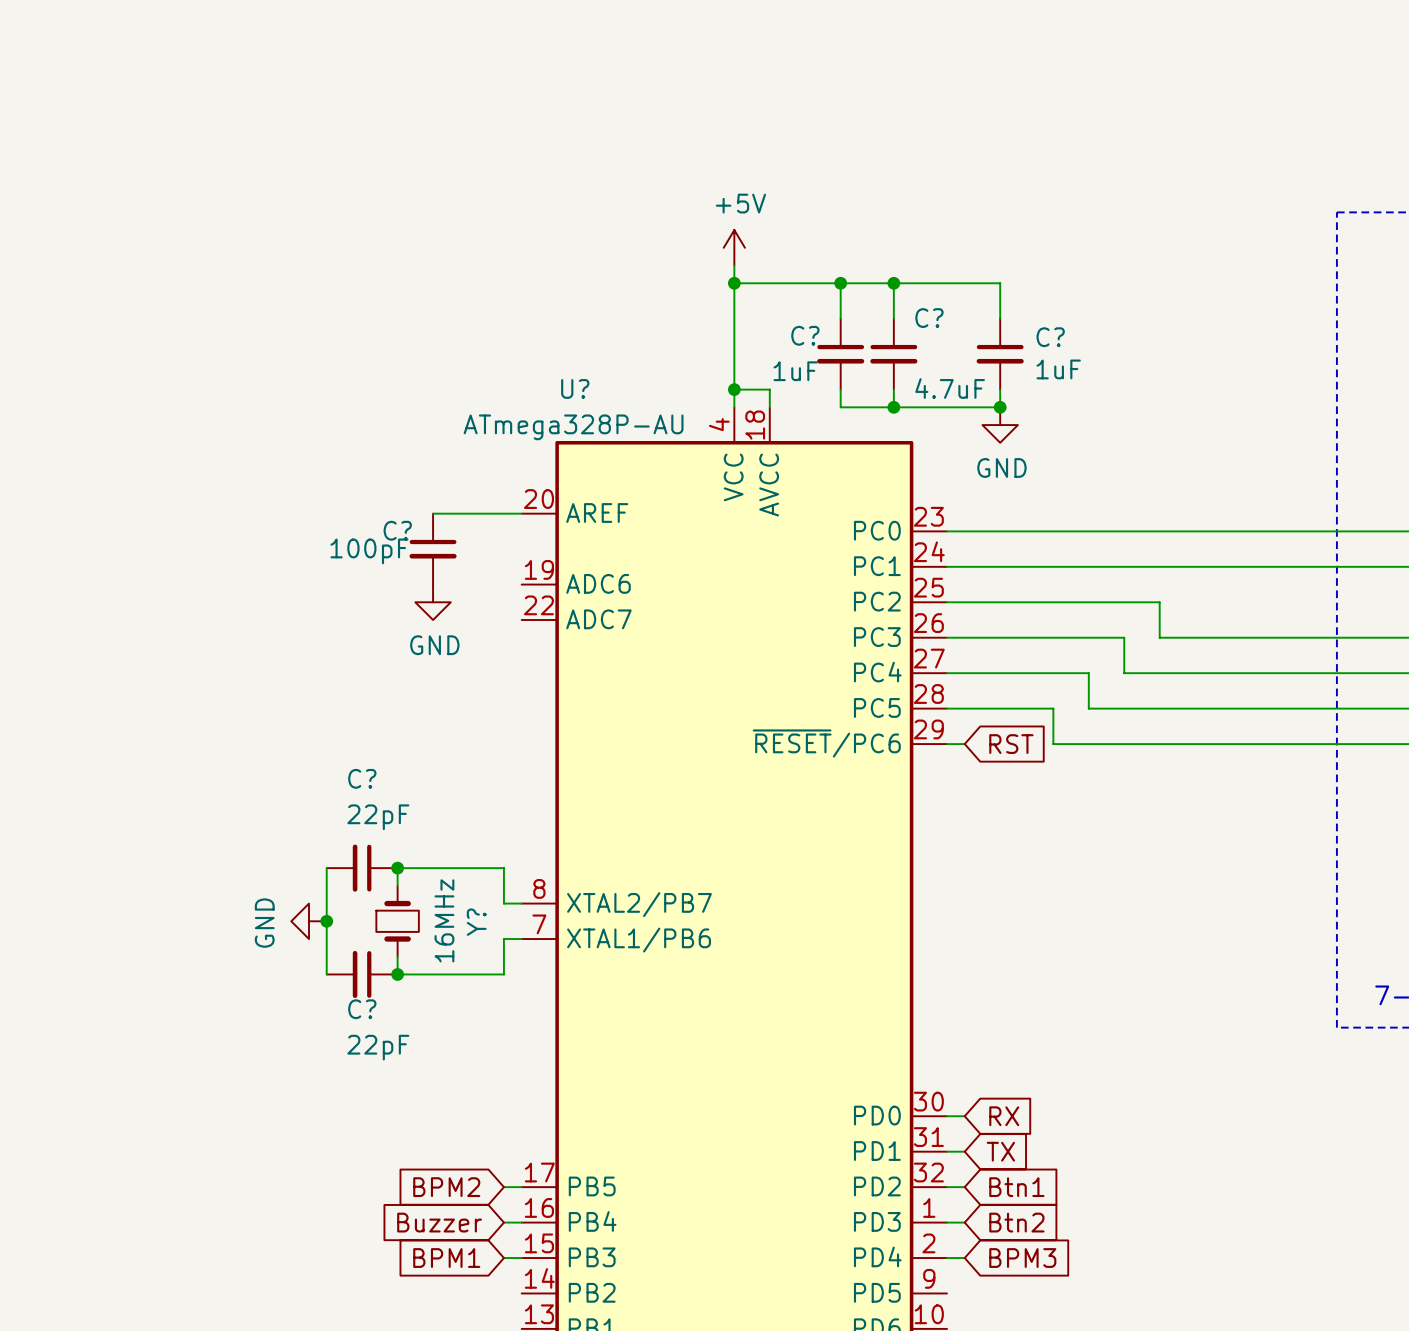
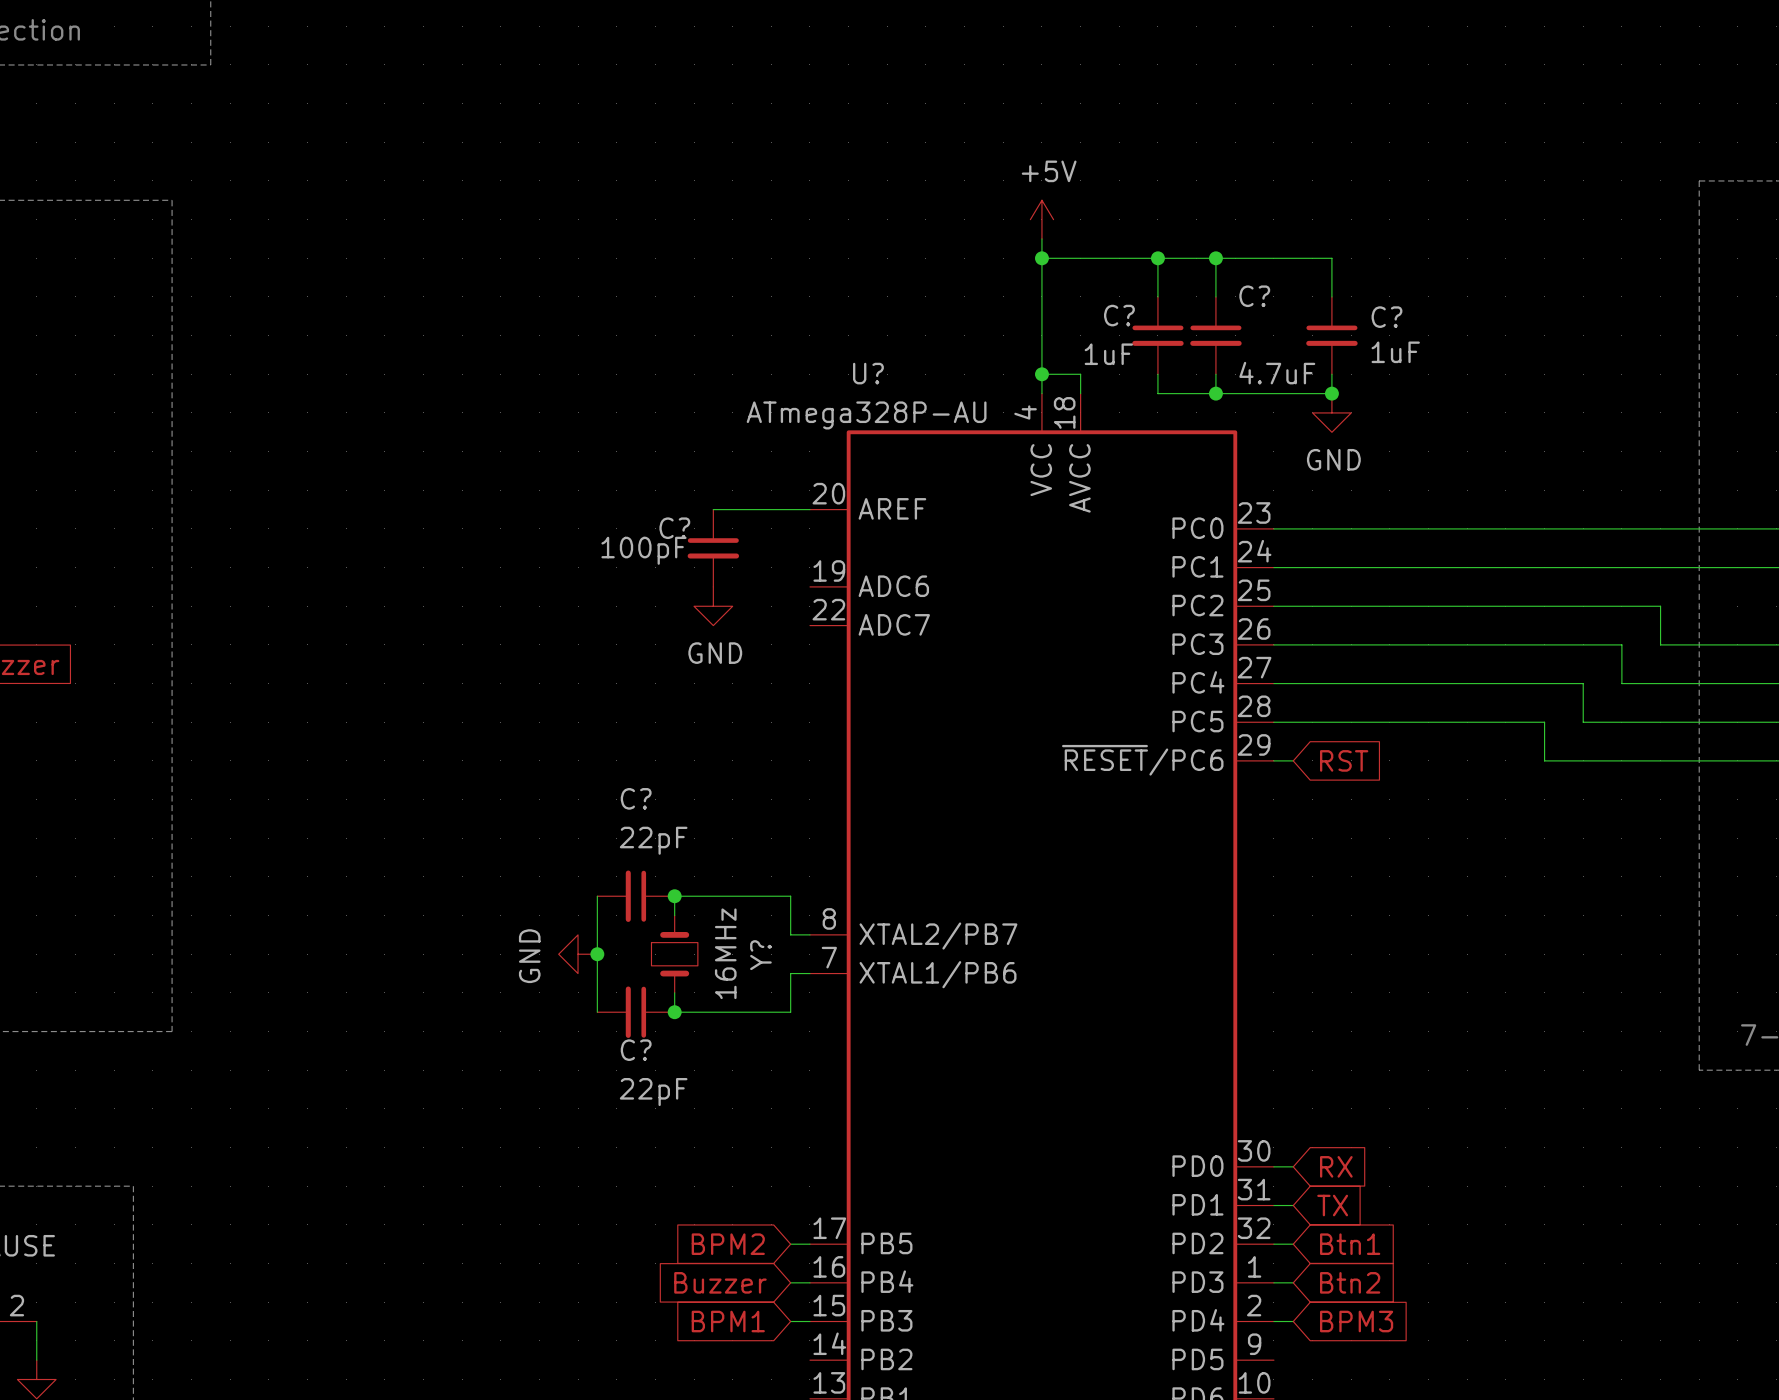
wire: (1159, 602) (1159, 637) -> (1467, 644) (1505, 644)
wire: none -> (1505, 606) (1660, 606) (1660, 644)
wire: (1124, 637) (1124, 673) -> (1544, 722) (1544, 760)
wire: (1266, 637) (1301, 637) -> (1621, 644) (1621, 683)
wire: (1088, 673) (1088, 708) -> (1428, 683) (1467, 683)
wire: (1230, 673) (1266, 673) -> none
wire: (1053, 708) (1053, 744) (1195, 744) -> (1389, 722) (1428, 722)
wire: (1195, 708) (1230, 708) -> (1583, 683) (1583, 722)

